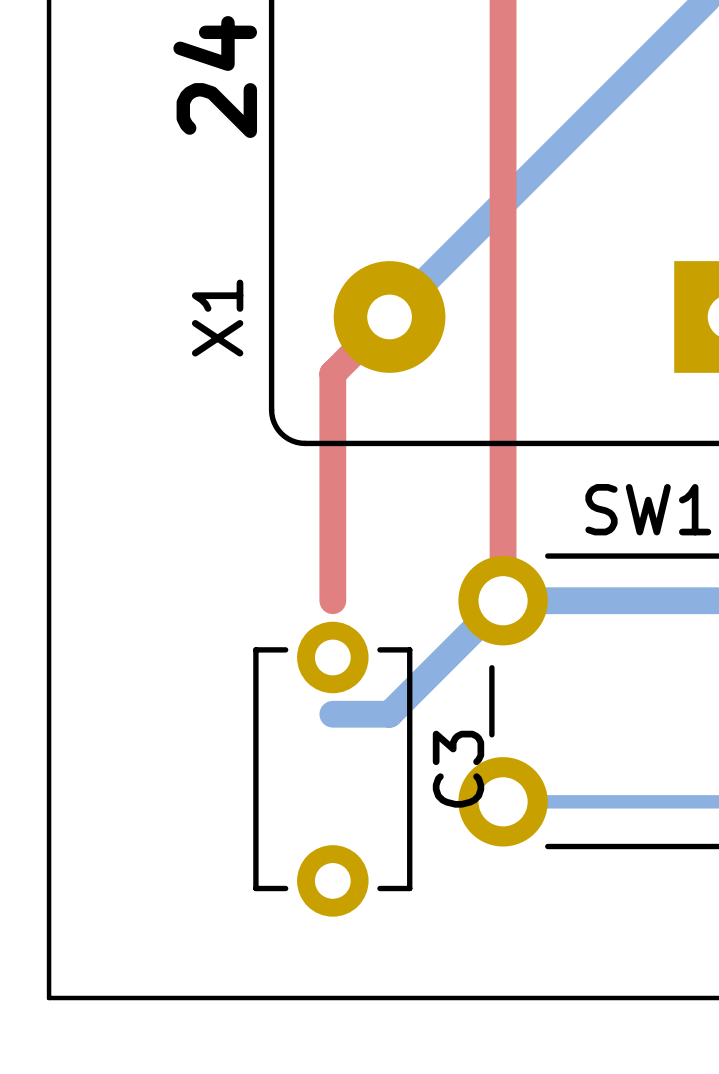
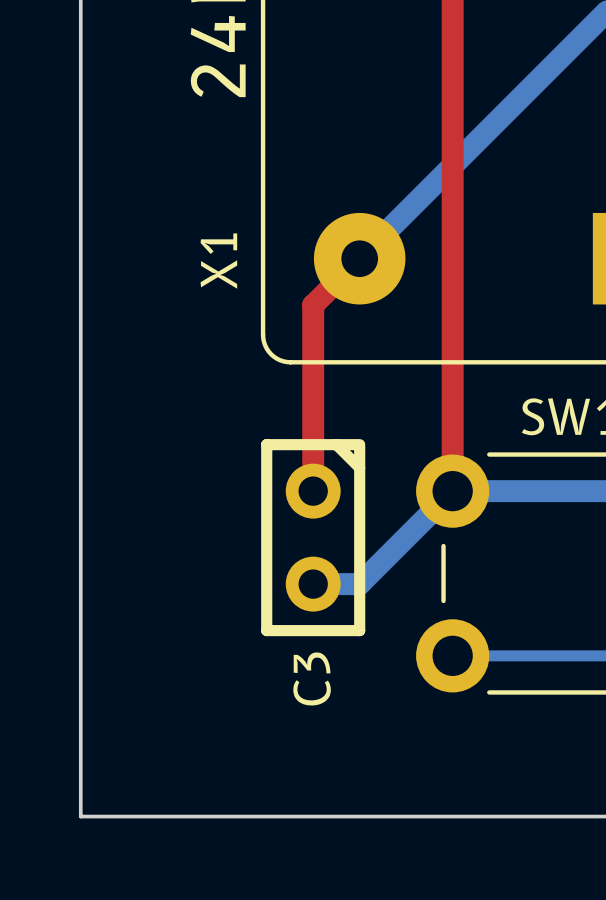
C3 footprint: [253, 621, 413, 917] -> [261, 439, 366, 637]
C3 name position: C3 (458, 769) -> C3 (312, 678)

